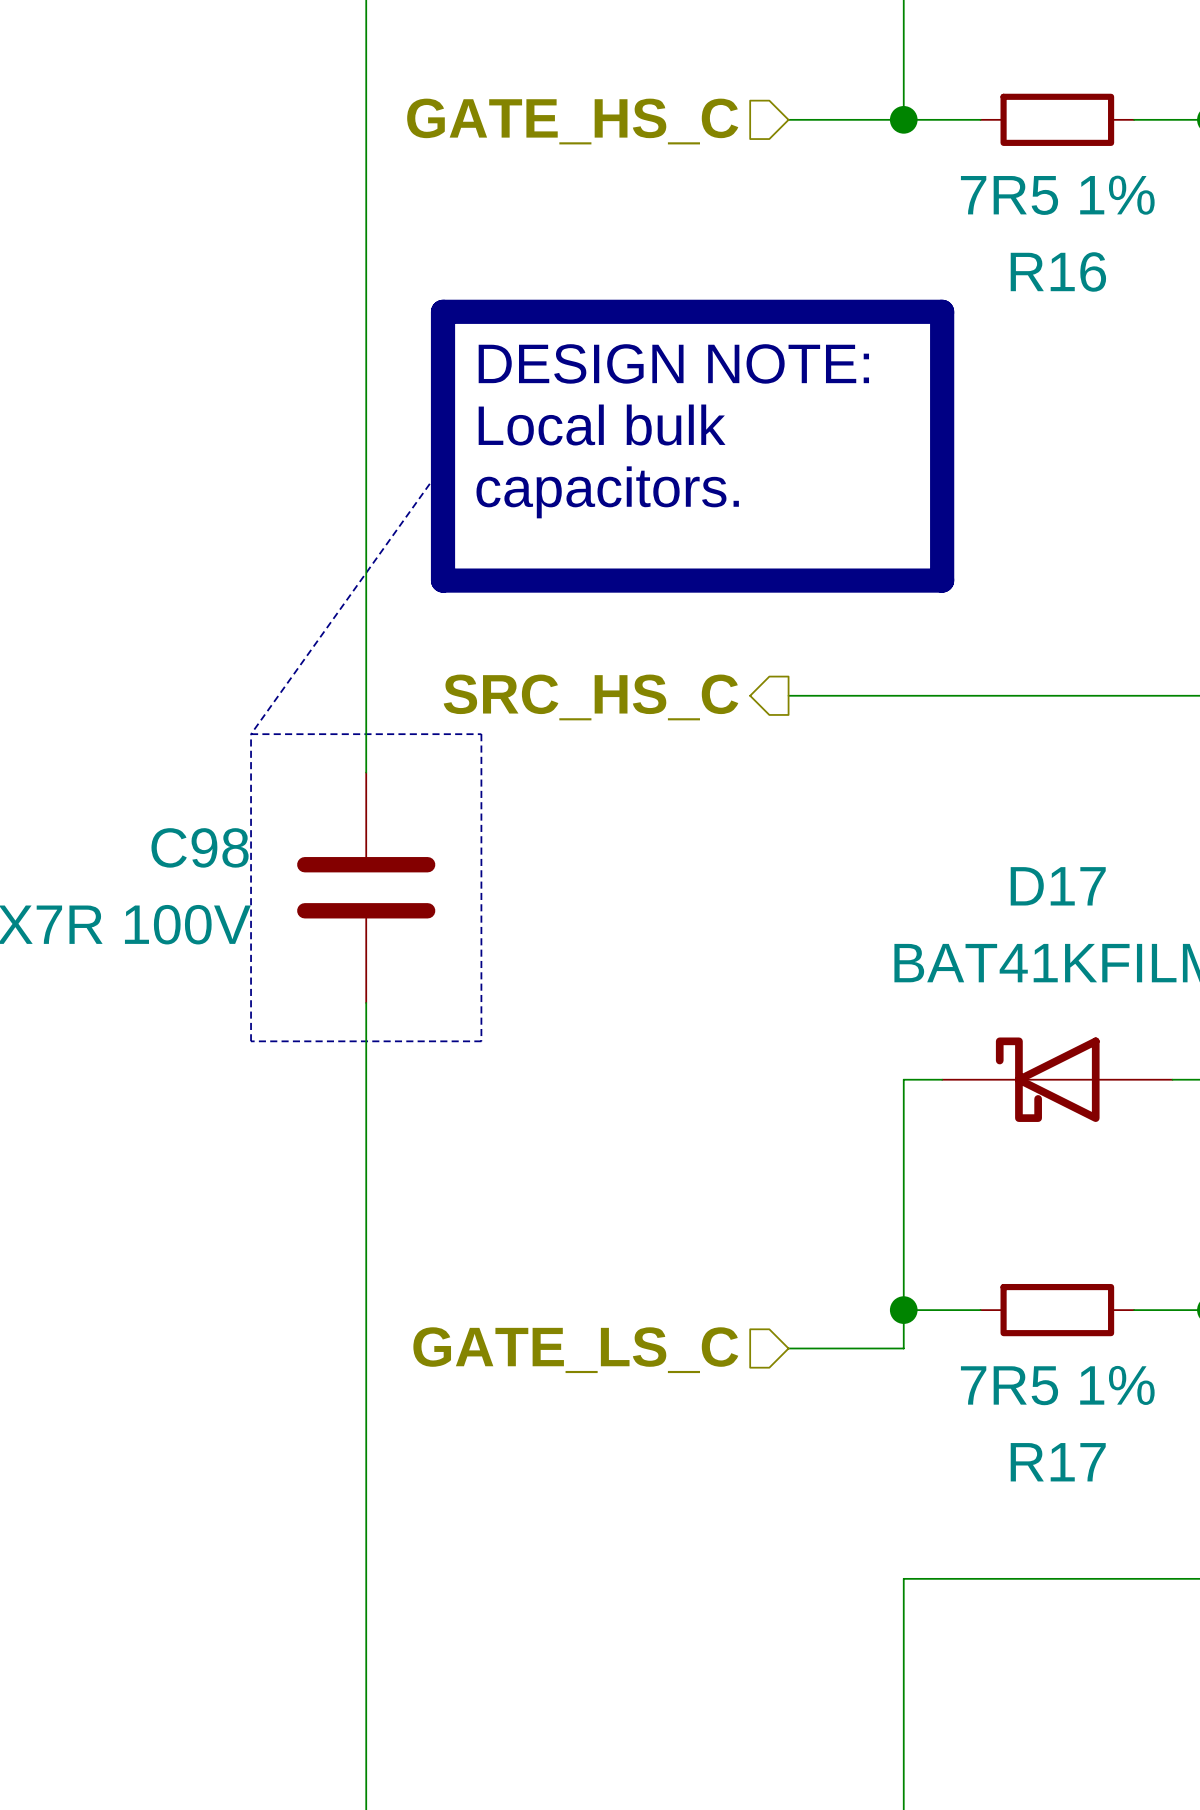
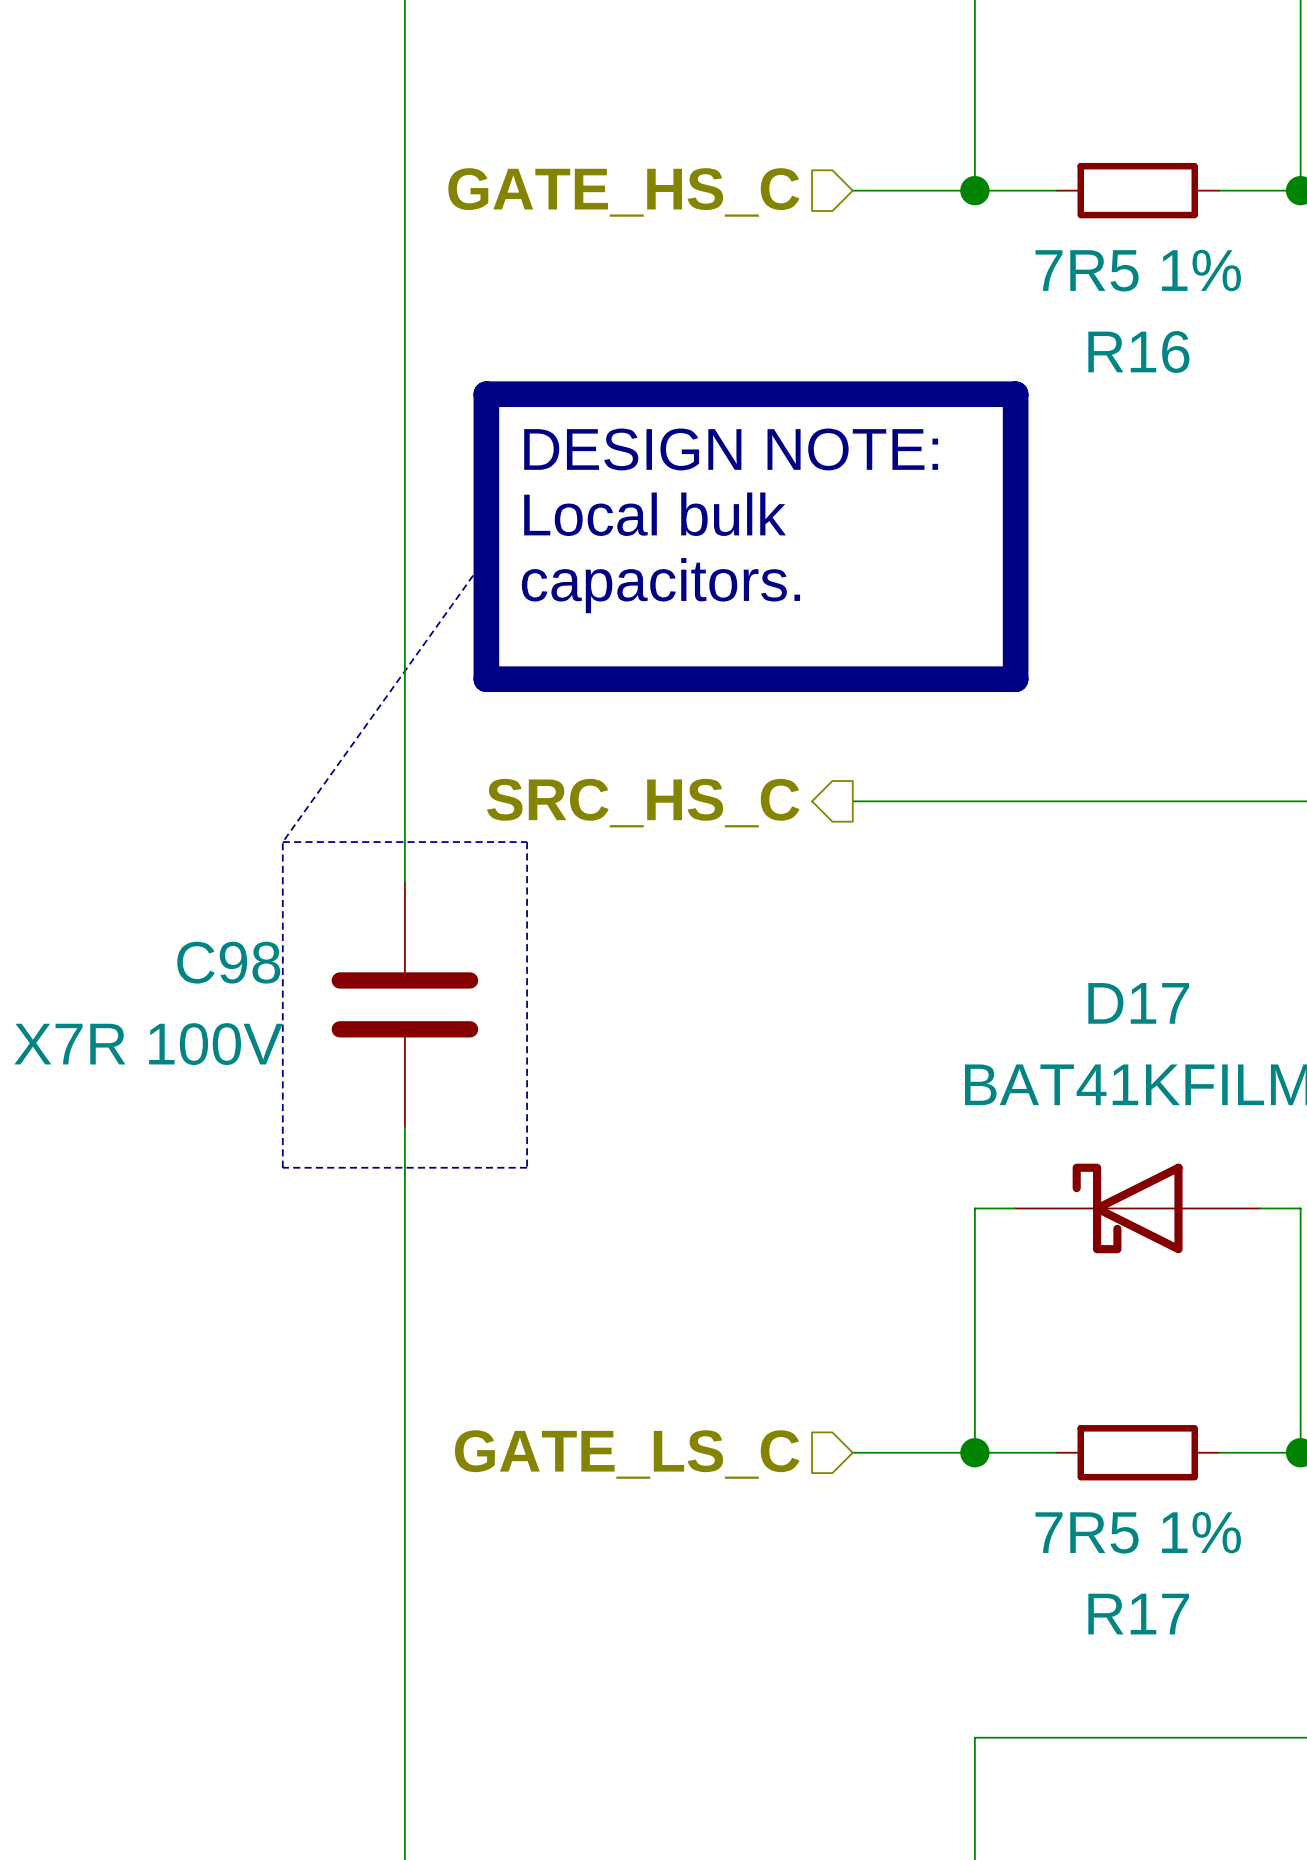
wire: (903, 1310) (903, 1348) (788, 1348) -> (974, 1452) (852, 1452)
hierarchical label position: GATE_LS_C (575, 1350) -> GATE_LS_C (627, 1454)

